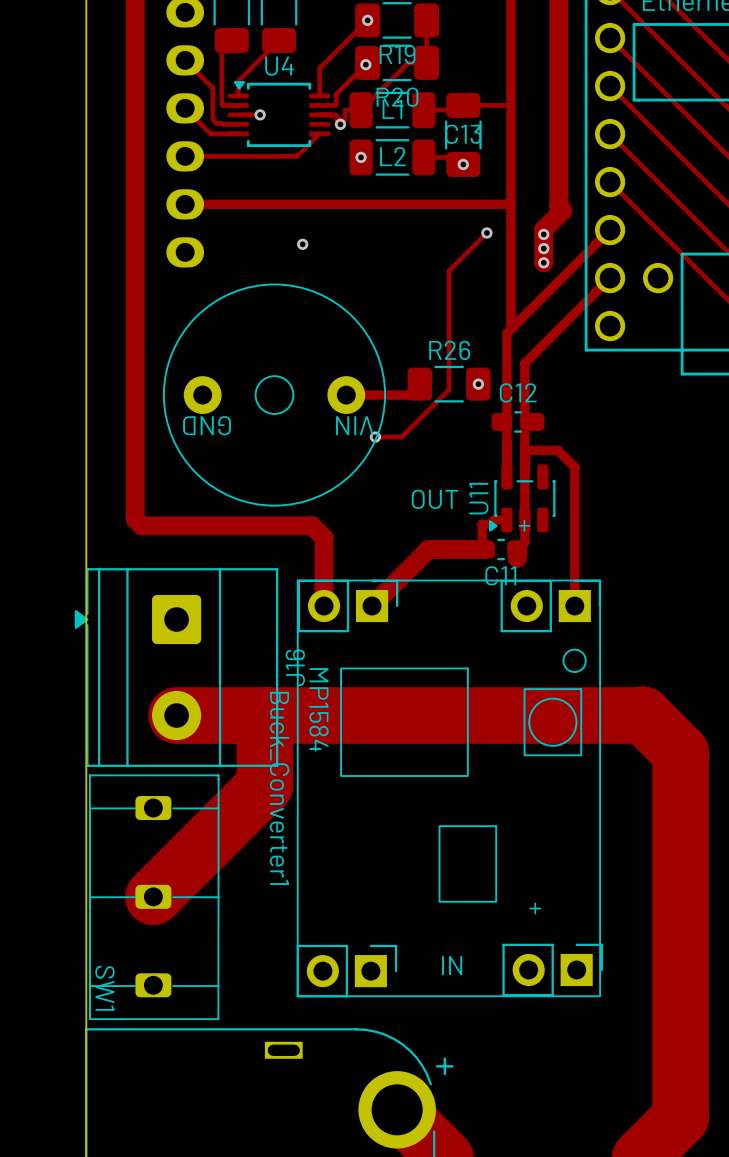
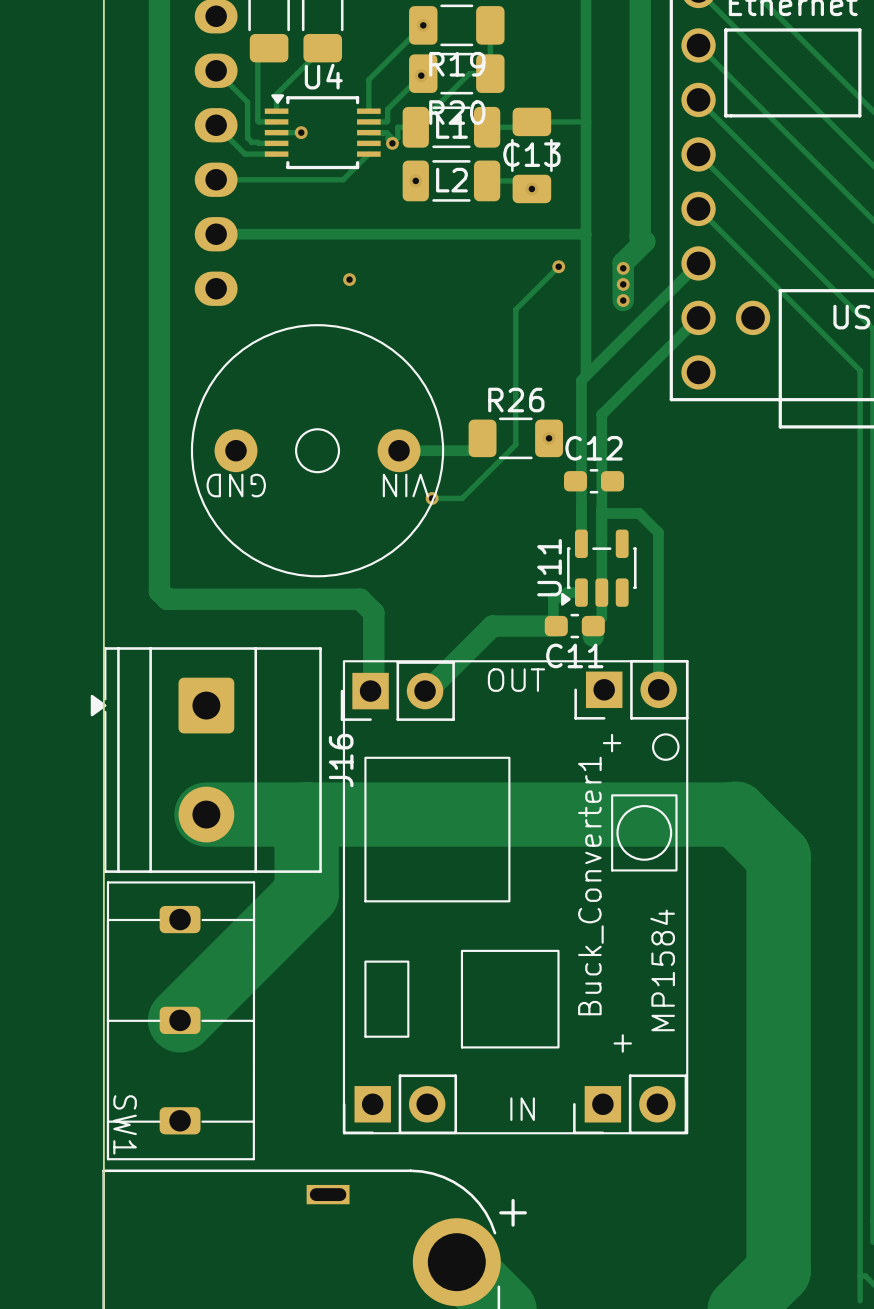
Buck_Converter1 footprint: [296, 579, 603, 998] -> [340, 659, 689, 1135]
Buck_Converter1 name position: Buck_Converter1 (279, 788) -> Buck_Converter1 (590, 886)

